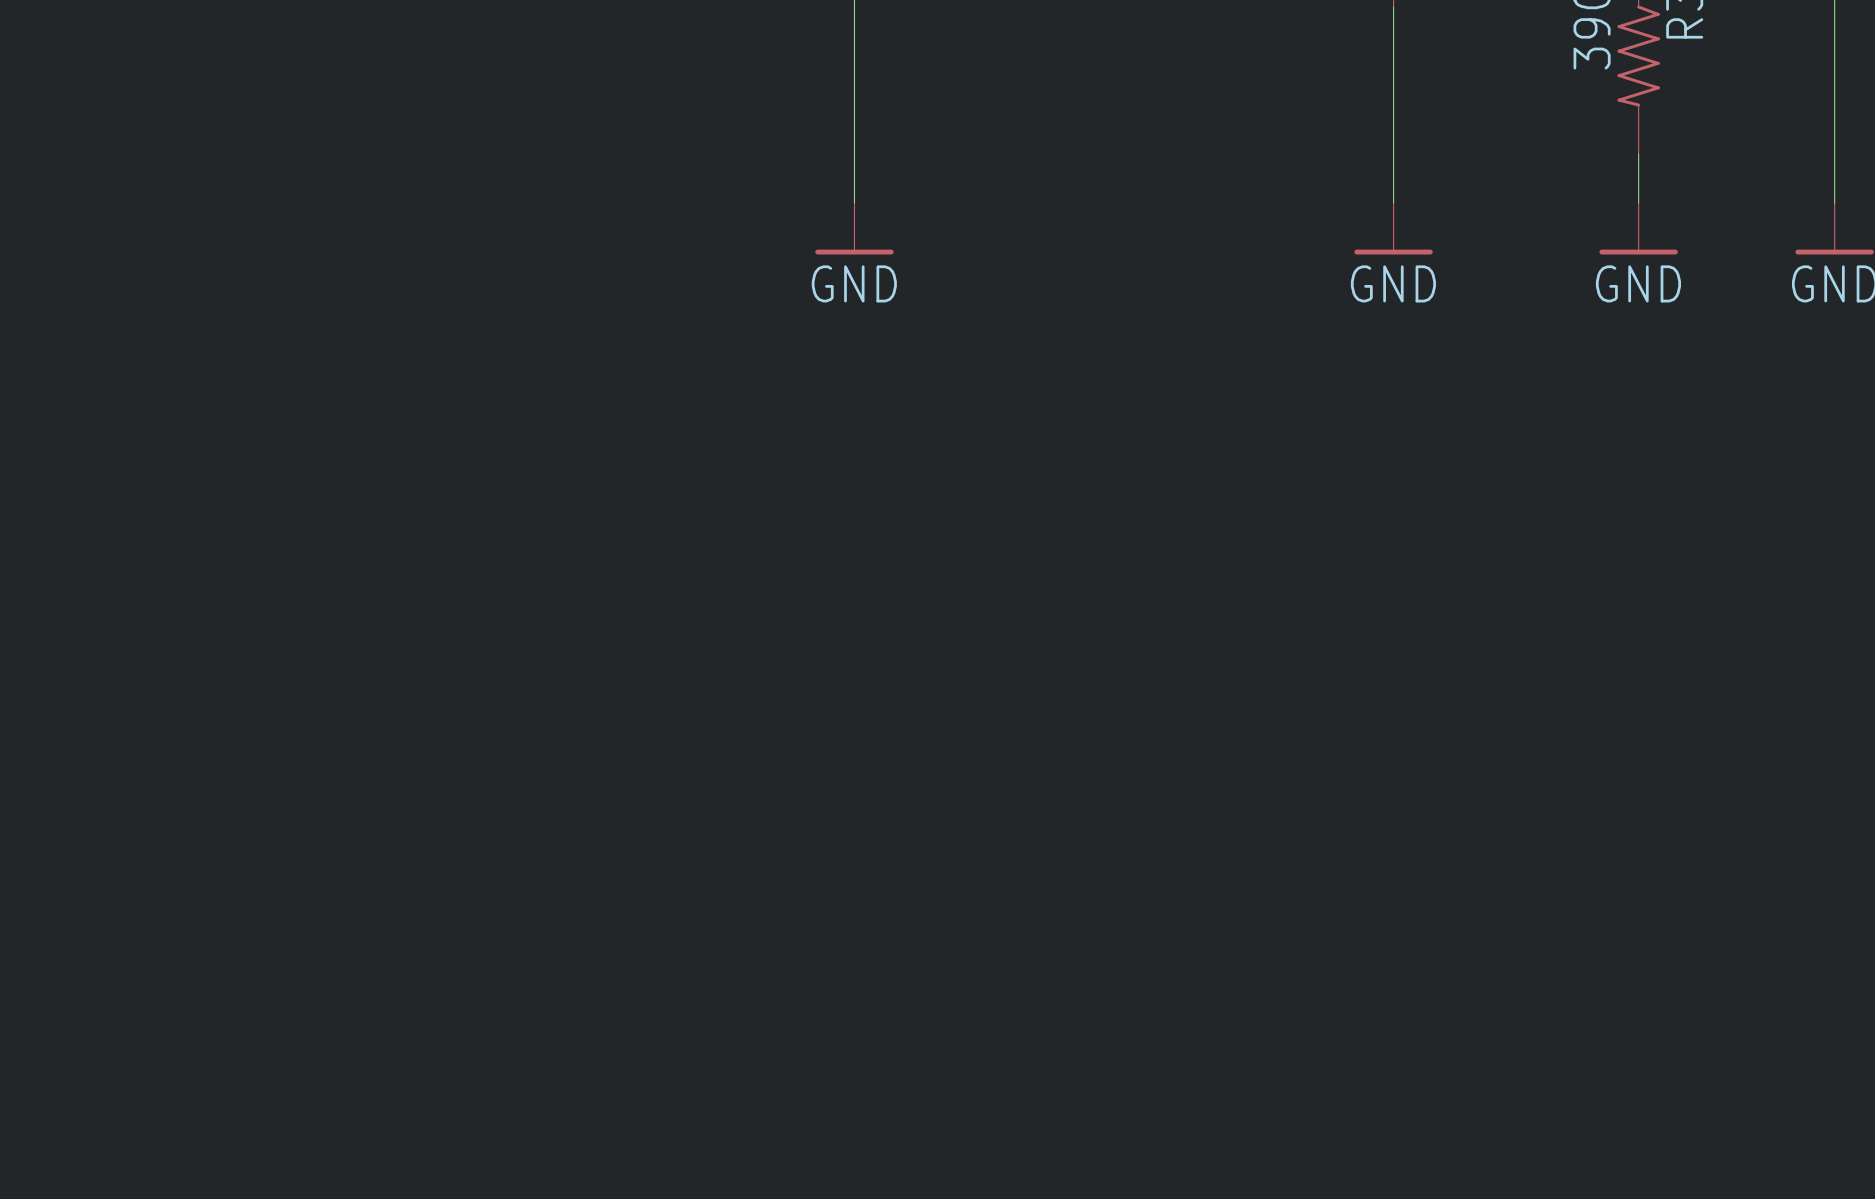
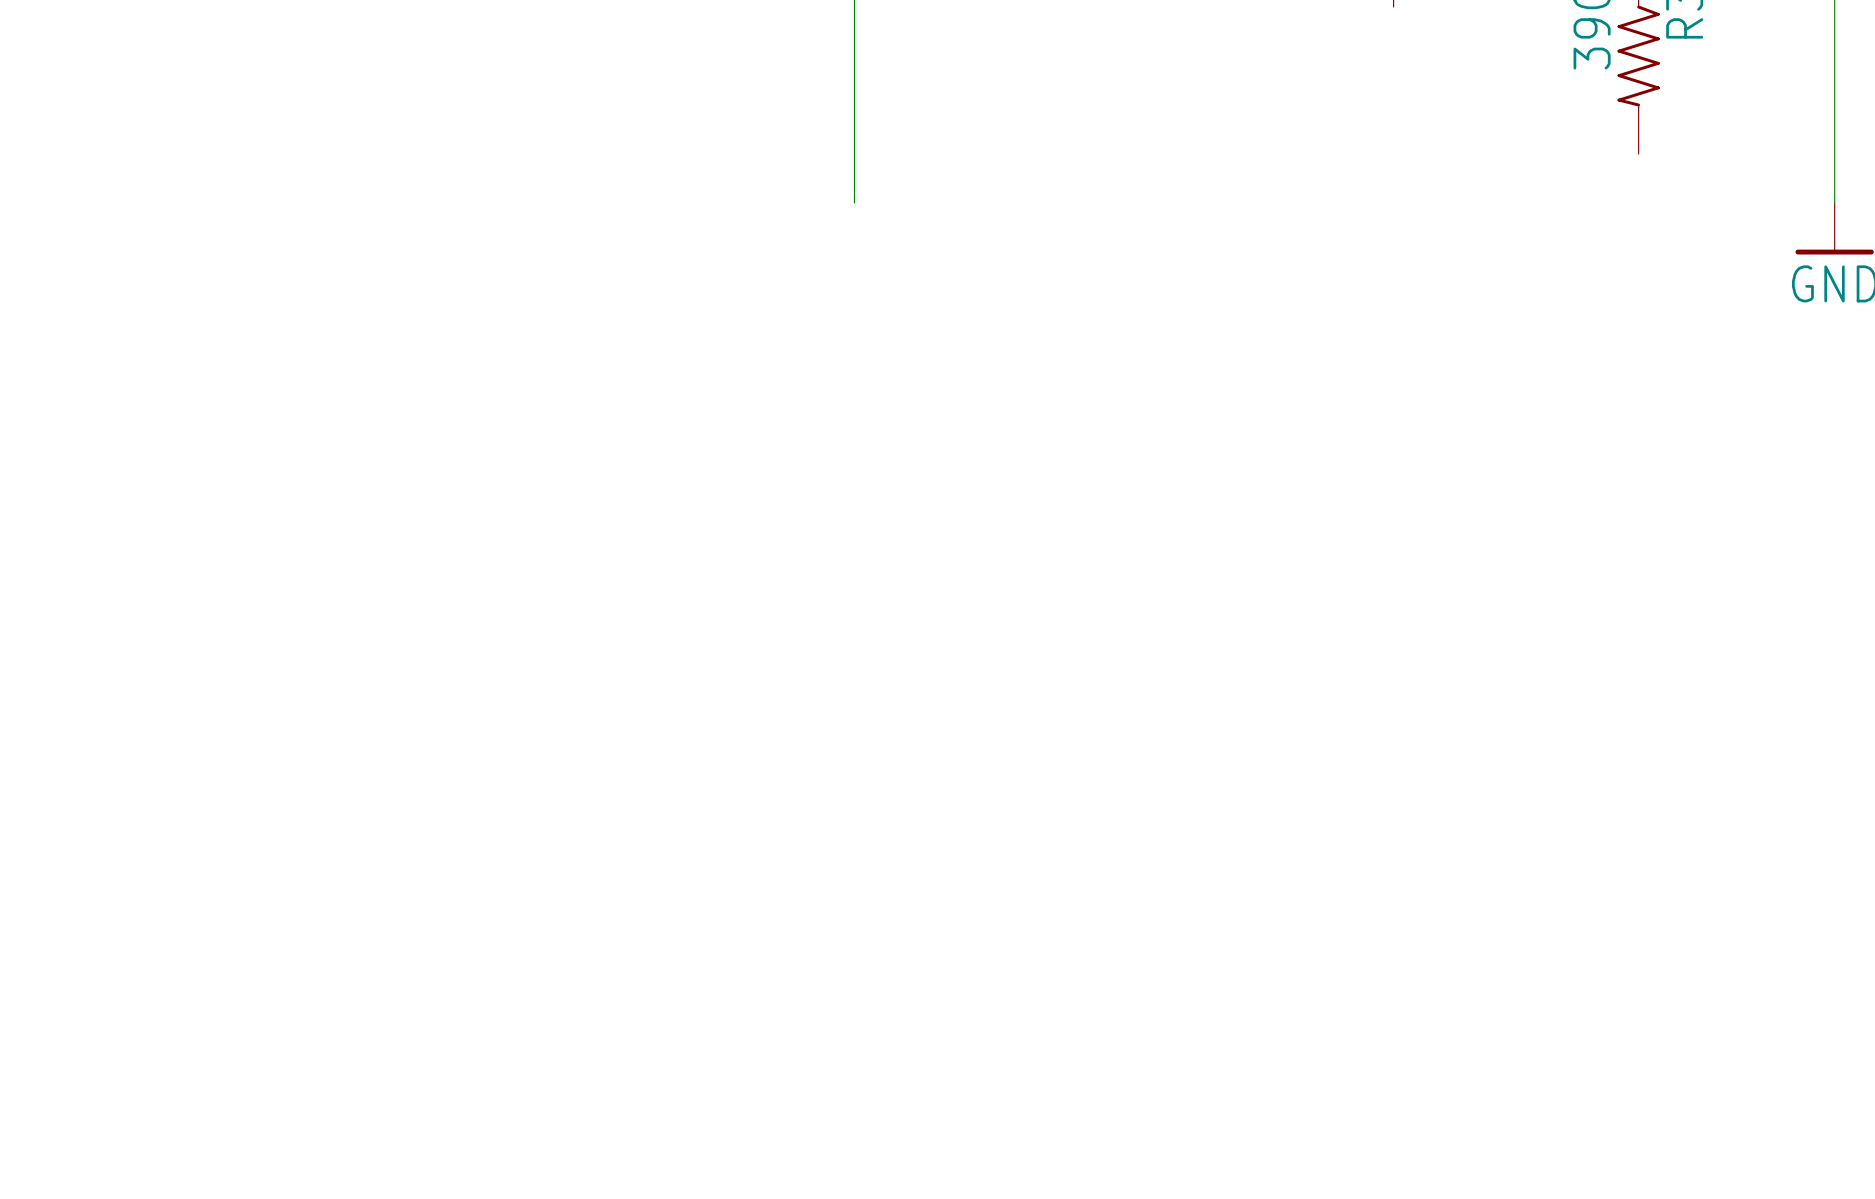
wire: (1393, 7) (1393, 203) -> none
wire: (1638, 154) (1638, 203) -> none
power symbol: GND (854, 228) -> none
power symbol: GND (1393, 228) -> none
power symbol: GND (1638, 228) -> none

